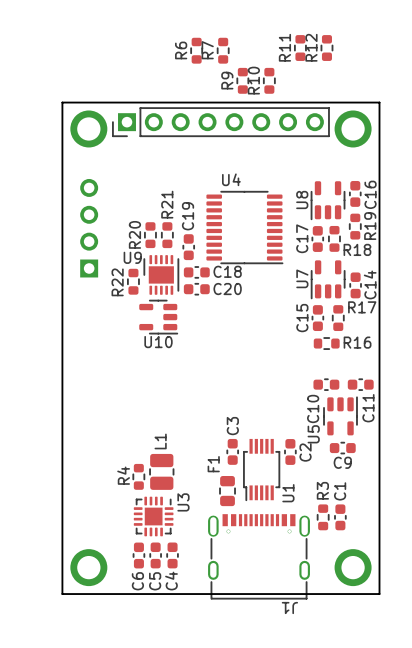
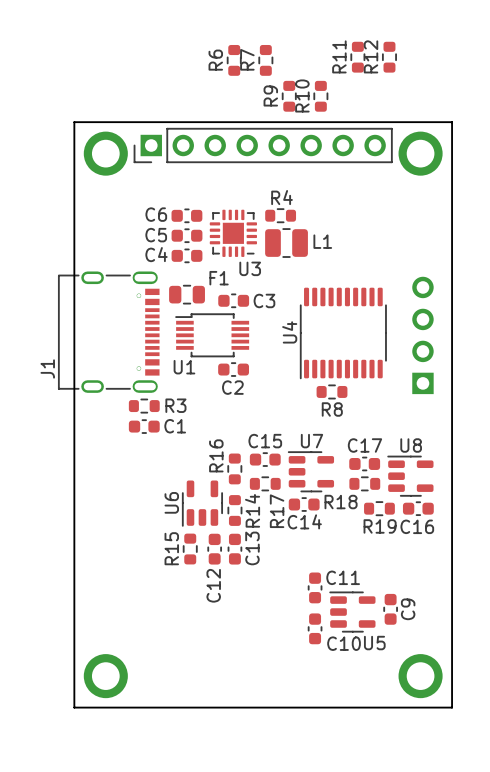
U4 name position: U4 (231, 179) -> U4 (289, 332)
C16 rotation: 0° (355, 193) -> 90° clockwise (418, 508)
C16 position: (355, 193) -> (418, 508)
U8 rotation: 0° (328, 200) -> 90° clockwise (410, 476)
U8 position: (328, 200) -> (410, 476)
R19 rotation: 0° (355, 226) -> 90° clockwise (379, 508)
R19 position: (355, 226) -> (379, 508)
U4 rotation: 0° (244, 227) -> 90° clockwise (343, 333)
U4 position: (244, 227) -> (343, 333)
part: (89, 228) -> none
R20: (150, 235) -> none
R21: (167, 235) -> none
R18 rotation: 0° (334, 238) -> 90° clockwise (364, 483)
R18 position: (334, 238) -> (364, 483)
C17 rotation: 0° (317, 239) -> 90° clockwise (364, 463)
C17 position: (317, 239) -> (364, 463)
C19: (188, 247) -> none
C18: (196, 272) -> none
U9: (161, 274) -> none
U7 rotation: 0° (328, 279) -> 90° clockwise (311, 471)
U7 position: (328, 279) -> (311, 471)
R22: (133, 281) -> none
part: none -> (422, 335)
C14 rotation: 0° (355, 285) -> 90° clockwise (304, 504)
C14 position: (355, 285) -> (304, 504)
C20: (196, 289) -> none
U10: (158, 317) -> none
C15 rotation: 0° (317, 318) -> 90° clockwise (265, 459)
C15 position: (317, 318) -> (265, 459)
R17 rotation: 0° (338, 318) -> 90° clockwise (265, 483)
R17 position: (338, 318) -> (265, 483)
R8: none -> (332, 391)
R16 name position: R16 (357, 342) -> R16 (216, 455)
R16 rotation: 0° (326, 343) -> 90° clockwise (234, 468)
R16 position: (326, 343) -> (234, 468)
C10 rotation: 0° (326, 384) -> 90° clockwise (315, 628)
C10 position: (326, 384) -> (315, 628)
C11 rotation: 0° (360, 384) -> 90° clockwise (315, 587)
C11 position: (360, 384) -> (315, 587)
C10 name position: C10 (313, 408) -> C10 (344, 643)
C11 name position: C11 (368, 408) -> C11 (343, 577)
U5 rotation: 0° (340, 416) -> 90° counterclockwise (352, 612)
U5 position: (340, 416) -> (352, 612)
U6: none -> (202, 503)
R14: none -> (234, 510)
C9 rotation: 0° (342, 448) -> 90° clockwise (390, 609)
C9 position: (342, 448) -> (390, 609)
C3 rotation: 0° (232, 451) -> 90° clockwise (233, 300)
C3 position: (232, 451) -> (233, 300)
C2 rotation: 0° (290, 451) -> 90° clockwise (233, 369)
C2 position: (290, 451) -> (233, 369)
R15: none -> (190, 549)
C12: none -> (214, 549)
C13: none -> (234, 549)
C9 name position: C9 (342, 462) -> C9 (408, 609)
U1 rotation: 0° (261, 469) -> 90° clockwise (212, 335)
U1 position: (261, 469) -> (212, 335)
L1 rotation: 0° (161, 471) -> 90° clockwise (286, 243)
L1 position: (161, 471) -> (286, 243)
R4 rotation: 0° (138, 476) -> 90° clockwise (280, 215)
R4 position: (138, 476) -> (280, 215)
F1 rotation: 0° (227, 491) -> 90° clockwise (187, 294)
F1 position: (227, 491) -> (187, 294)
U3 rotation: 0° (153, 516) -> 90° clockwise (233, 233)
U3 position: (153, 516) -> (233, 233)
R3 rotation: 0° (323, 517) -> 90° clockwise (144, 406)
R3 position: (323, 517) -> (144, 406)
C1 rotation: 0° (340, 517) -> 90° clockwise (144, 426)
C1 position: (340, 517) -> (144, 426)
C6 rotation: 0° (138, 555) -> 90° clockwise (186, 215)
C6 position: (138, 555) -> (186, 215)
C5 rotation: 0° (155, 555) -> 90° clockwise (187, 235)
C5 position: (155, 555) -> (187, 235)
C4 rotation: 0° (172, 555) -> 90° clockwise (187, 255)
C4 position: (172, 555) -> (187, 255)
J1 rotation: 0° (259, 556) -> 90° clockwise (108, 332)
J1 position: (259, 556) -> (108, 332)

